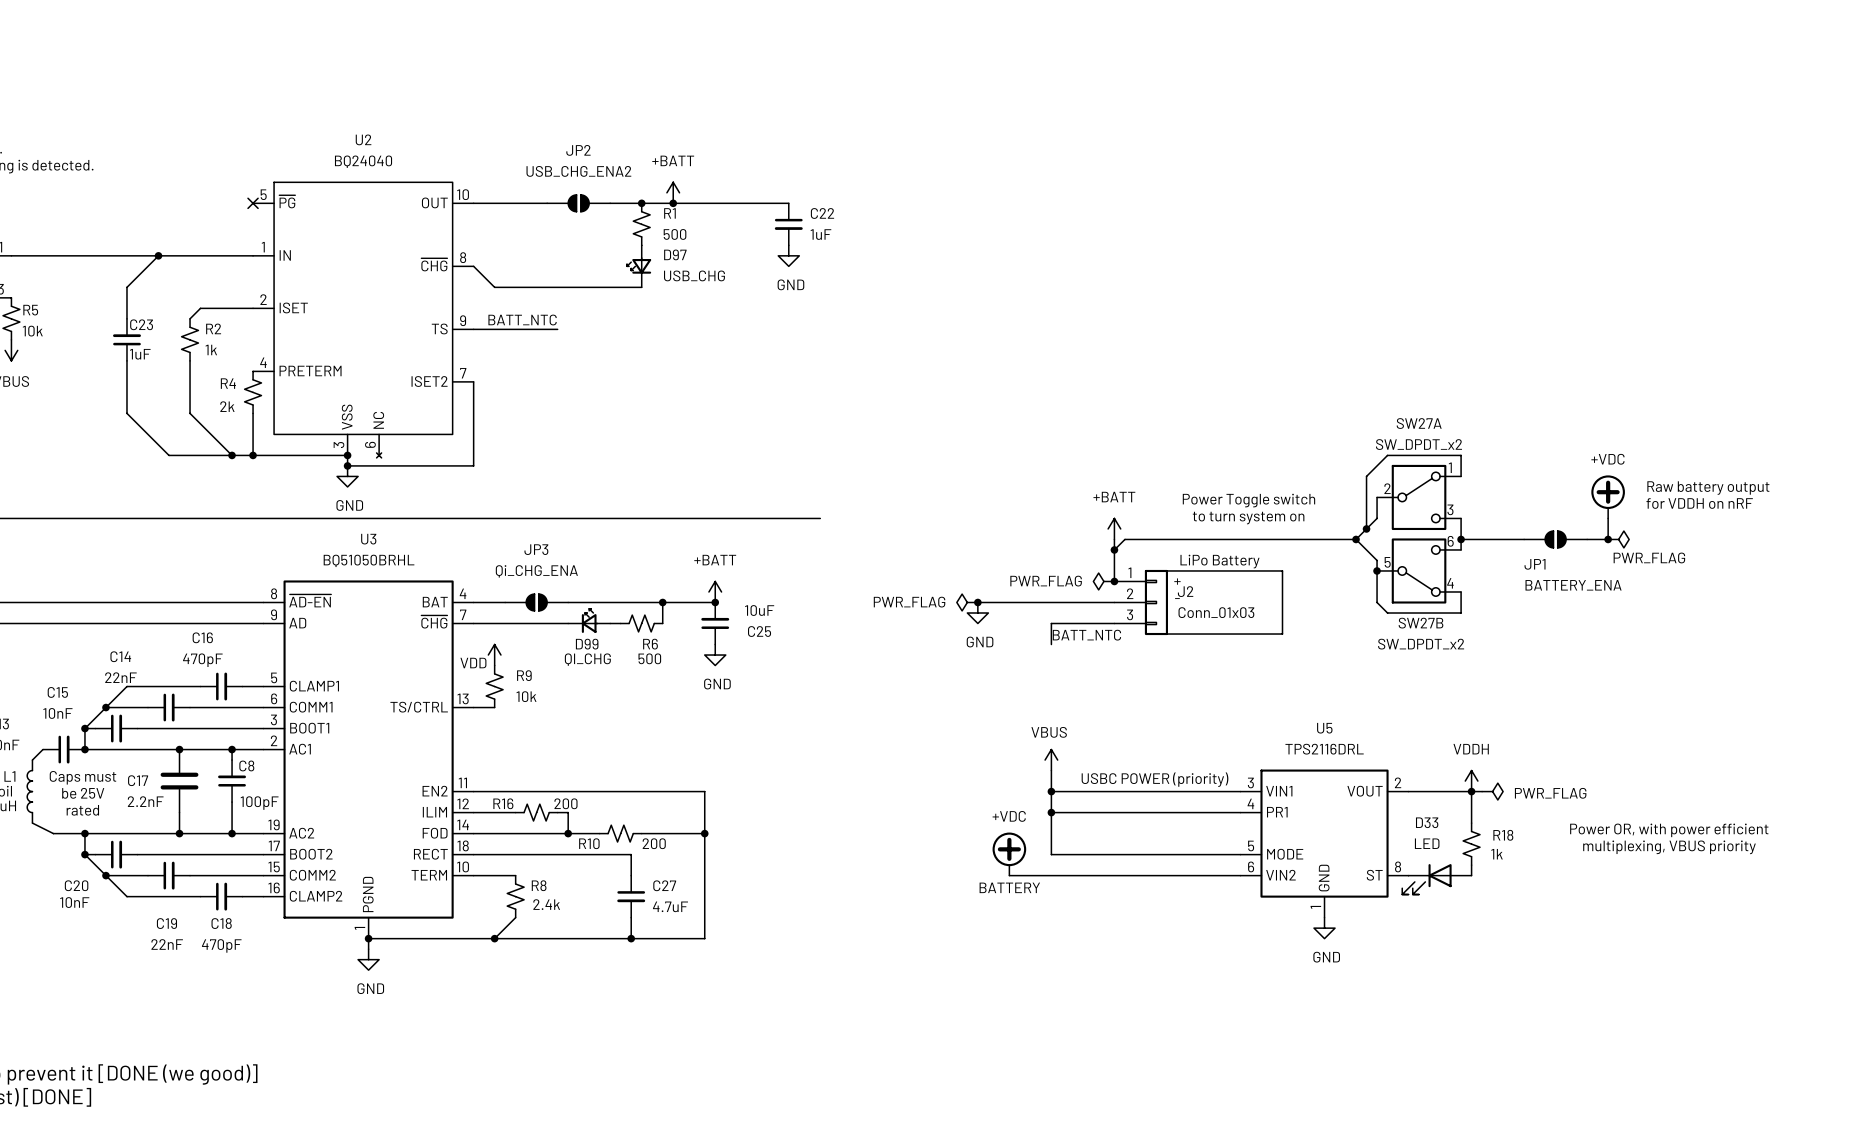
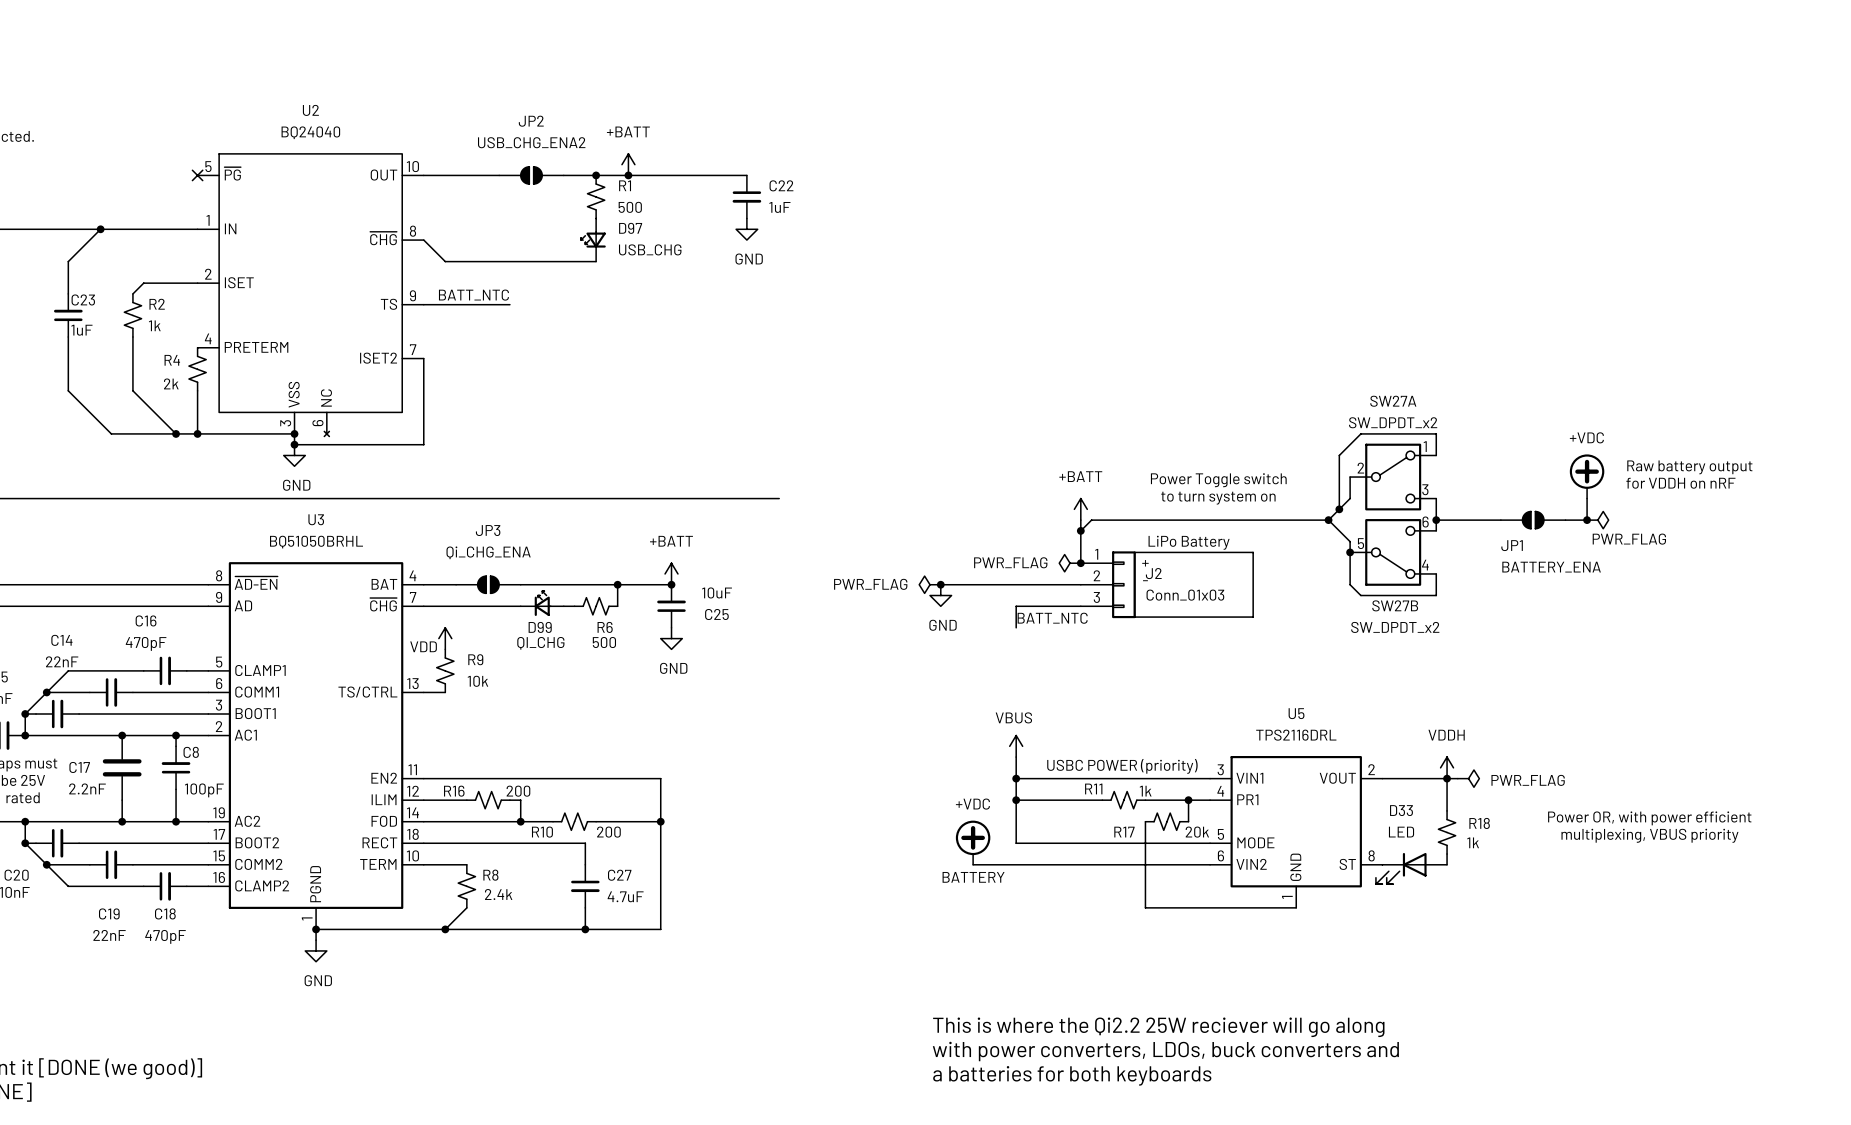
R11: none -> 1k (1123, 800)
wire: none -> (1188, 800) (1188, 821)
junction: none -> (1188, 800)
wire: none -> (1145, 821) (1145, 907) (1296, 907)
R17: none -> 20k (1166, 821)
power symbol: GND (1324, 928) -> none
text: none -> This is where the Qi2.2 25W reciever will go along (1158, 1027)
text: none -> with power converters, LDOs, buck converters and (1165, 1051)
text: none -> a batteries for both keyboards (1072, 1075)

